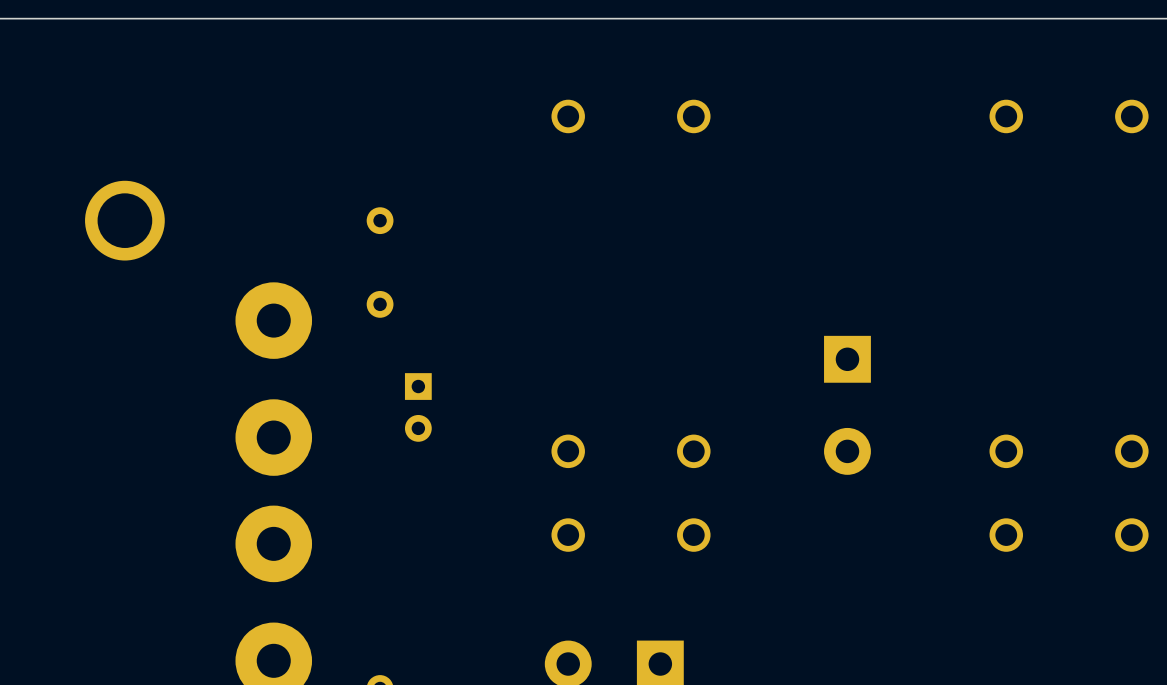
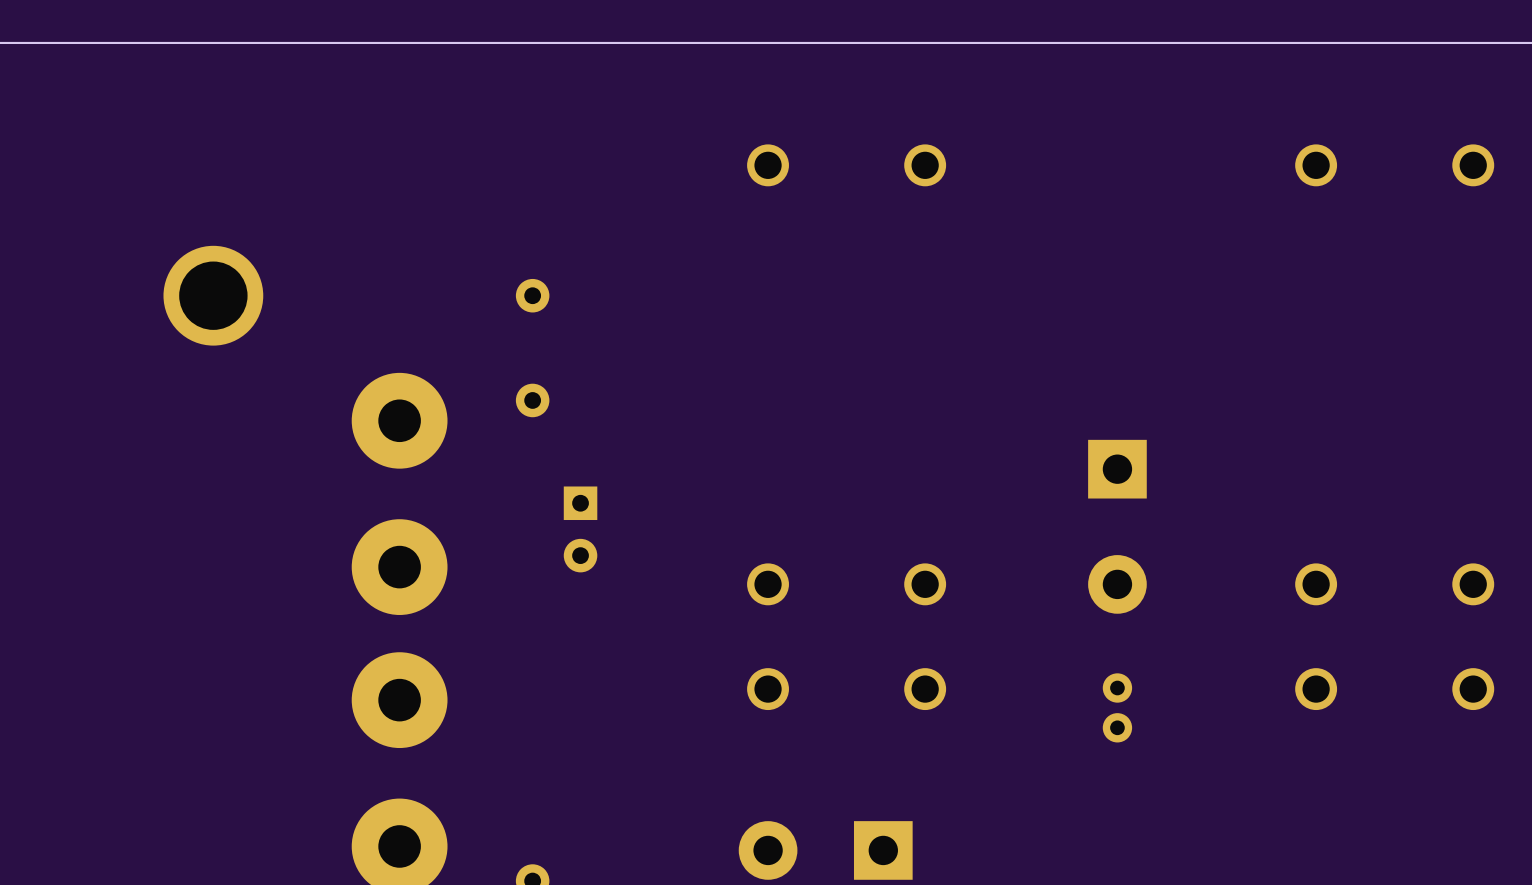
part: none -> (1117, 707)

